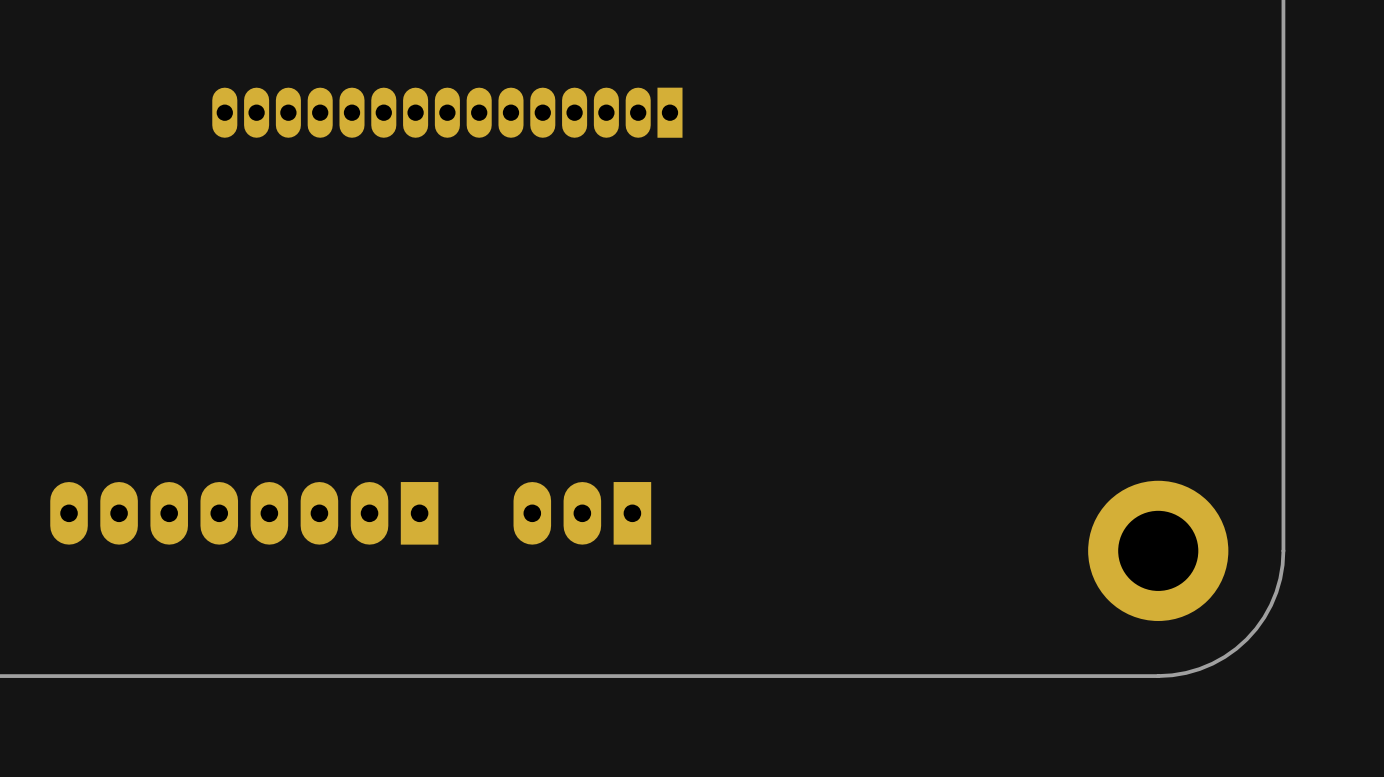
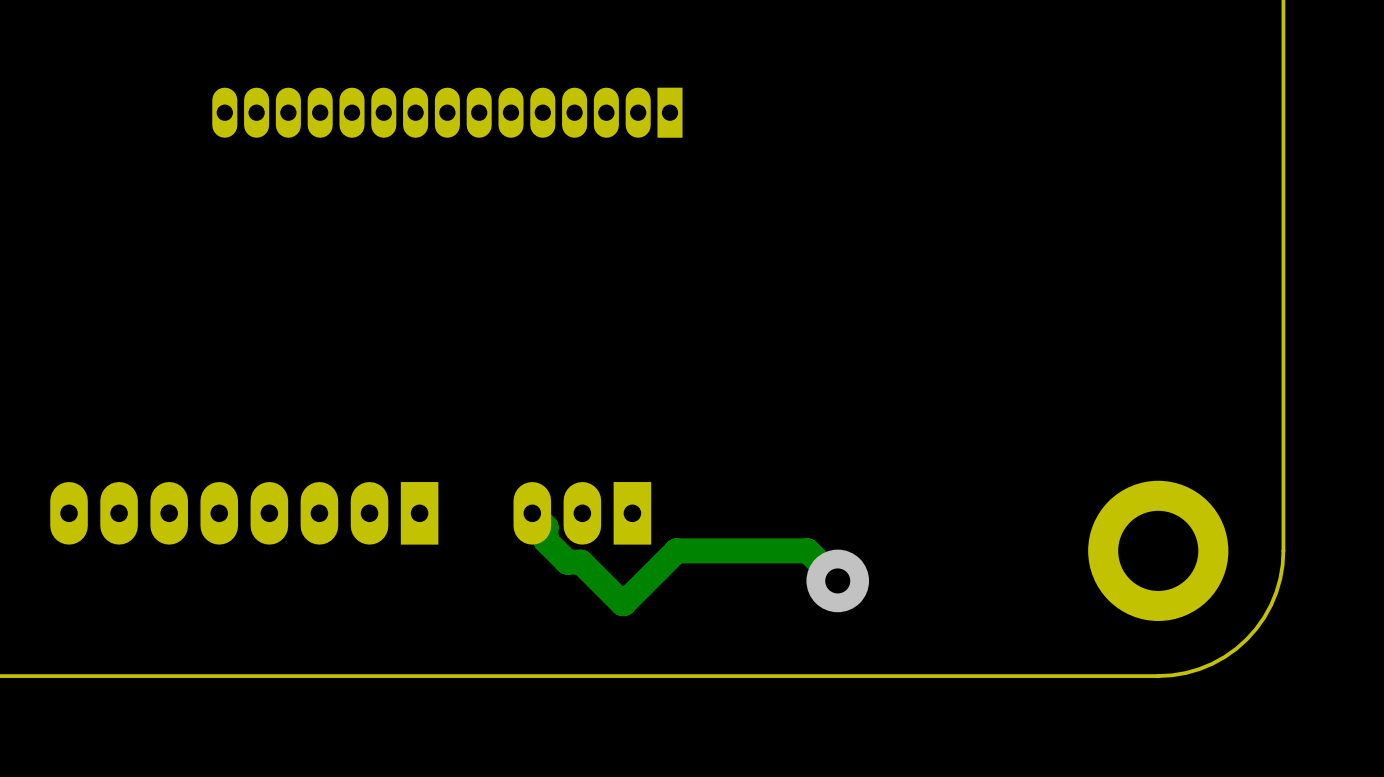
track: none -> (532, 513) (546, 527) (546, 540) (567, 562) (581, 562) (622, 603) (676, 550) (807, 550) (837, 580)
via: none -> (837, 580)

